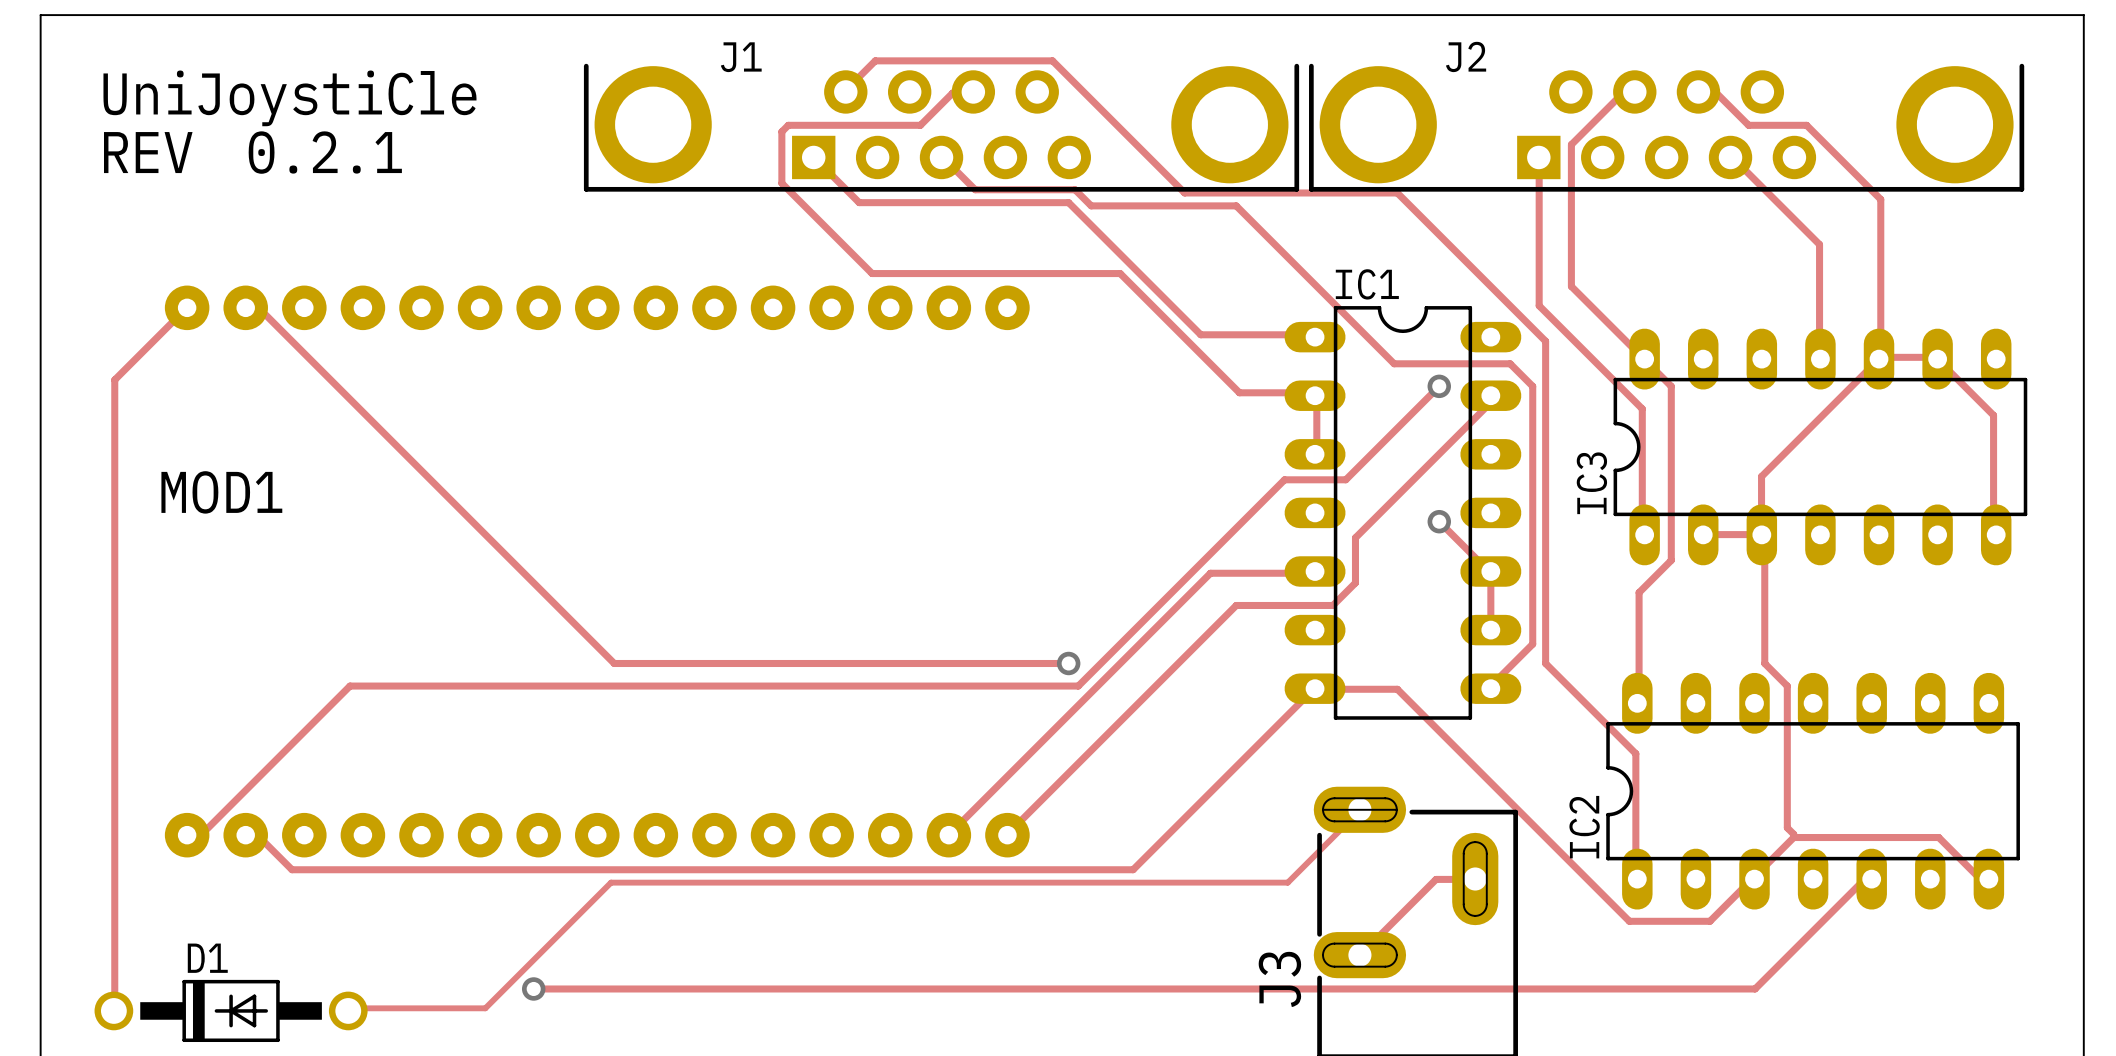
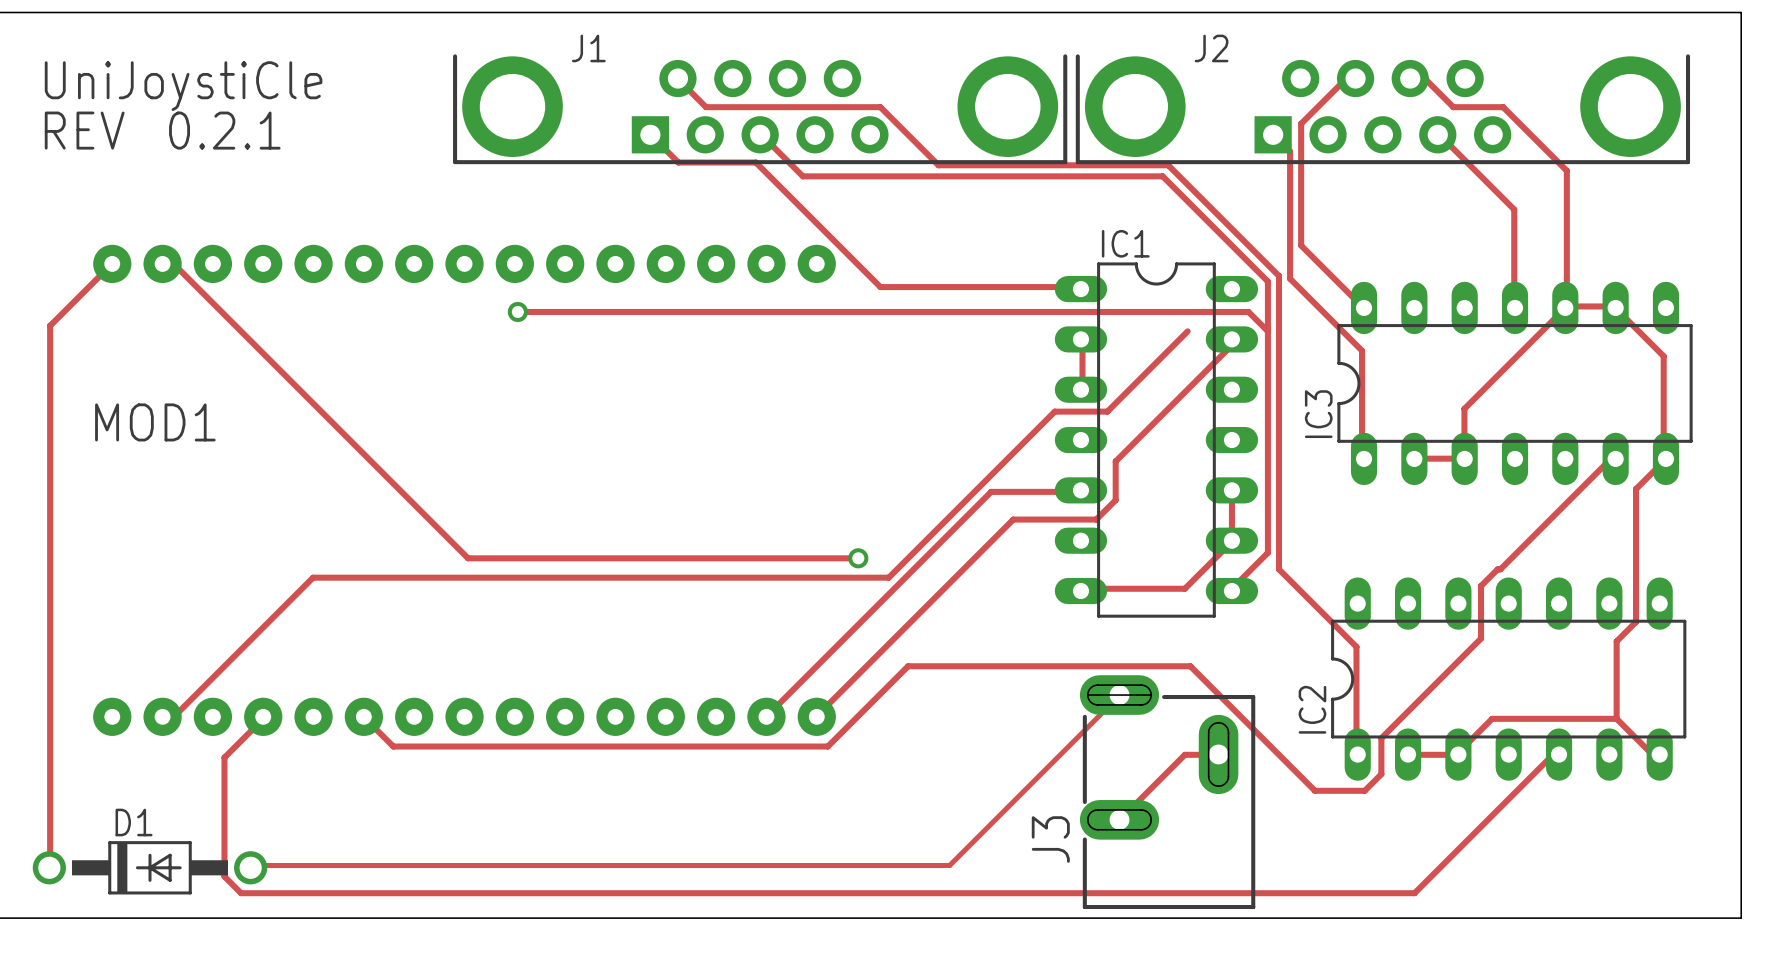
track: (845, 91) (875, 60) (1052, 60) (1184, 192) -> (742, 107) (880, 107) (938, 165) (969, 165)
track: (973, 91) (952, 93) (920, 125) -> none
track: (878, 125) (788, 125) (781, 131) (781, 183) (872, 273) (1120, 273) (1239, 392) (1313, 392) (1315, 395) -> (706, 107) (677, 78)
track: (1539, 157) (1539, 305) (1558, 325) -> (1273, 134) (1290, 151) (1290, 278)
track: (846, 189) (859, 202) (1068, 202) (1200, 334) -> (678, 162) (755, 162) (880, 287) (982, 287)
track: (975, 189) (1075, 189) (1091, 205) -> (789, 162) (802, 176) (888, 176)
track: (1397, 192) (1410, 205) -> (1151, 165) (1168, 165) (1278, 276) (1278, 292)
track: (1236, 205) (1394, 363) -> (1013, 176) (1162, 176)
track: (1532, 328) (1545, 341) -> (1267, 281) (1267, 331)
track: (1644, 359) (1671, 386) (1671, 560) (1639, 592) (1639, 702) (1637, 703) -> none
track: none -> (517, 311) (1148, 311)
via: none -> (517, 311)
via: (1439, 386) -> none
track: (1439, 521) (1490, 571) -> none
via: (1439, 521) -> none
track: (1761, 534) (1764, 537) (1764, 663) (1787, 686) (1787, 827) (1793, 834) (1793, 837) -> none
track: none -> (1615, 458) (1613, 461) (1608, 461) (1500, 569) (1497, 569) (1481, 585) (1481, 638) (1381, 738) (1381, 774) (1364, 790)
track: none -> (1665, 458) (1636, 489) (1636, 621) (1616, 641) (1616, 718)
track: none -> (1231, 540) (1184, 588) (1082, 588) (1080, 591)
track: (601, 650) (614, 663) (1068, 663) -> (468, 558) (858, 558)
via position: (1068, 663) -> (858, 558)
track: (1091, 673) (1078, 686) (350, 686) (201, 834) (187, 835) -> (888, 577) (313, 577) (174, 716) (162, 716)
track: (245, 835) (246, 837) (259, 837) (292, 869) (514, 869) -> (363, 716) (393, 746)
track: (1020, 869) (1133, 869) (1313, 689) (1397, 689) (1629, 921) -> (827, 746) (908, 666) (1190, 666) (1314, 790) (1350, 790)
track: (1751, 879) (1709, 921) (1645, 921) -> (1456, 754) (1408, 754)
track: (1287, 882) (611, 882) (485, 1008) -> (1057, 757) (949, 865) (368, 865)
track: (533, 988) (1755, 988) -> (263, 716) (224, 757) (224, 876) (241, 893) (1414, 893) (1458, 848)
via: (533, 988) -> none

